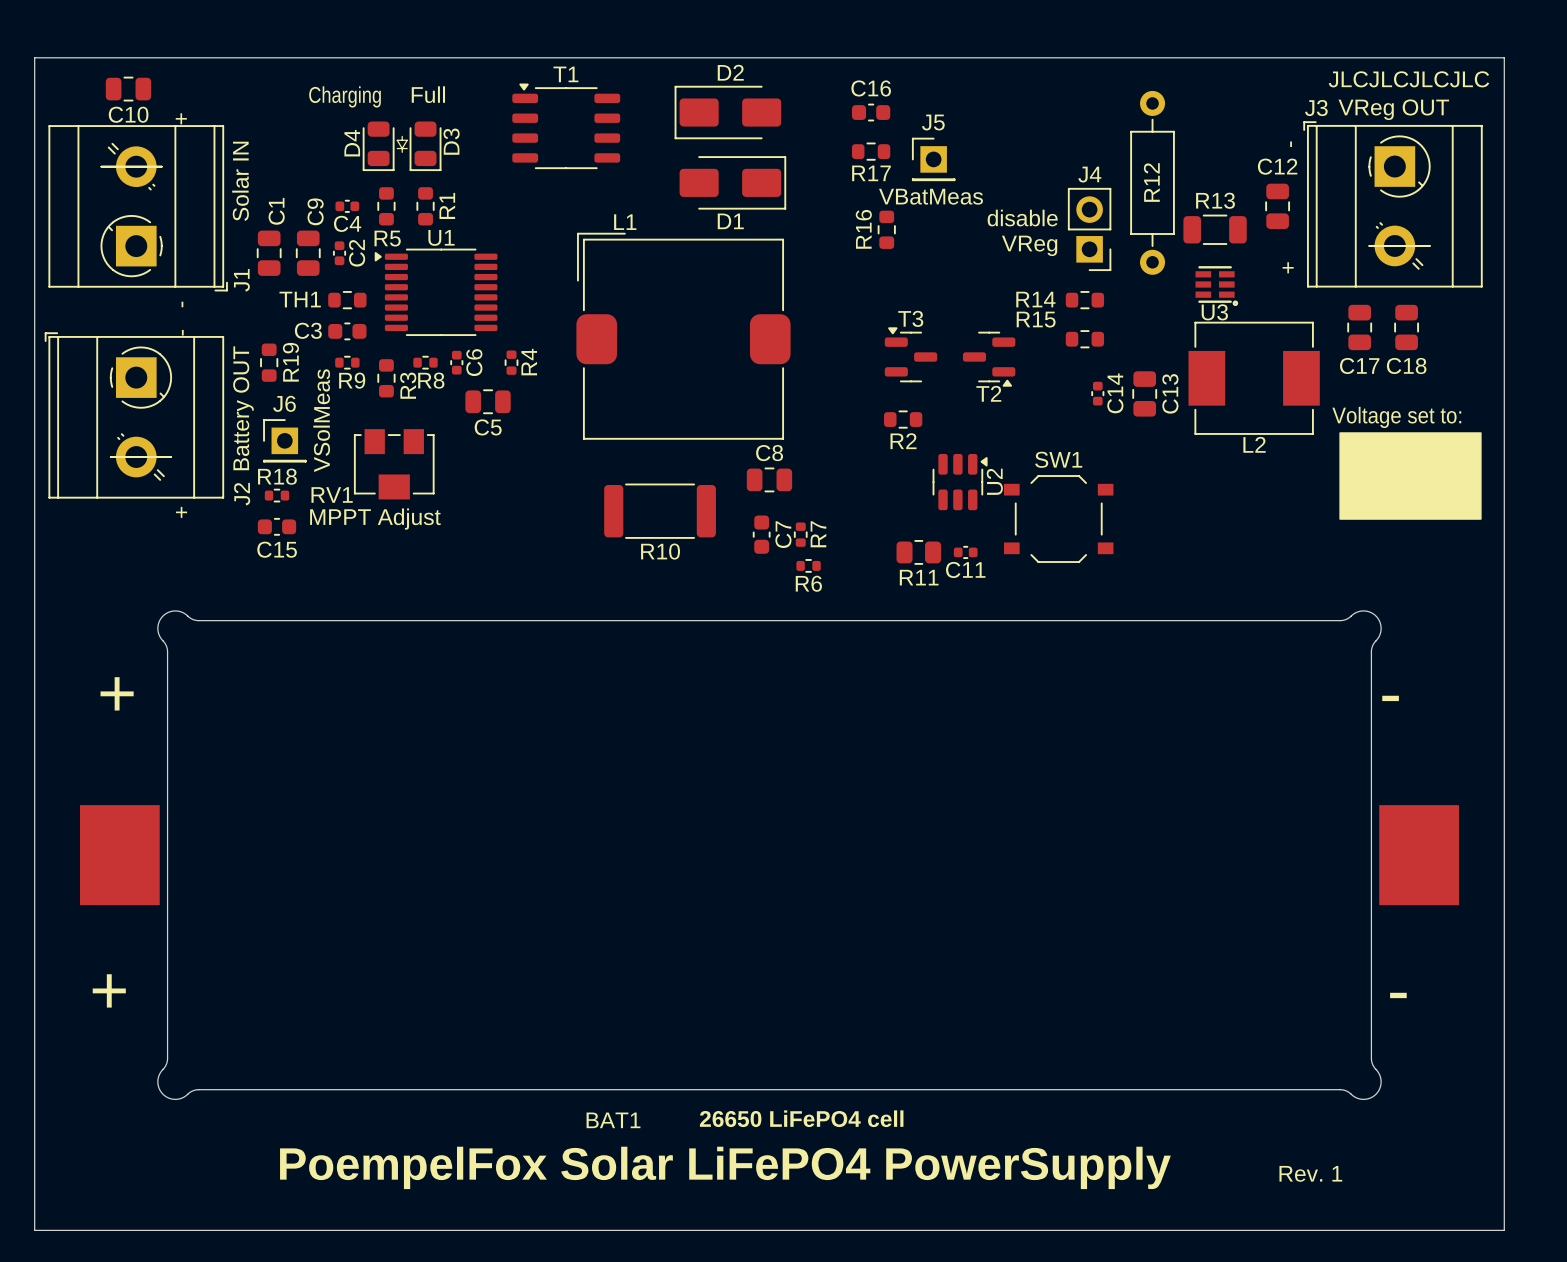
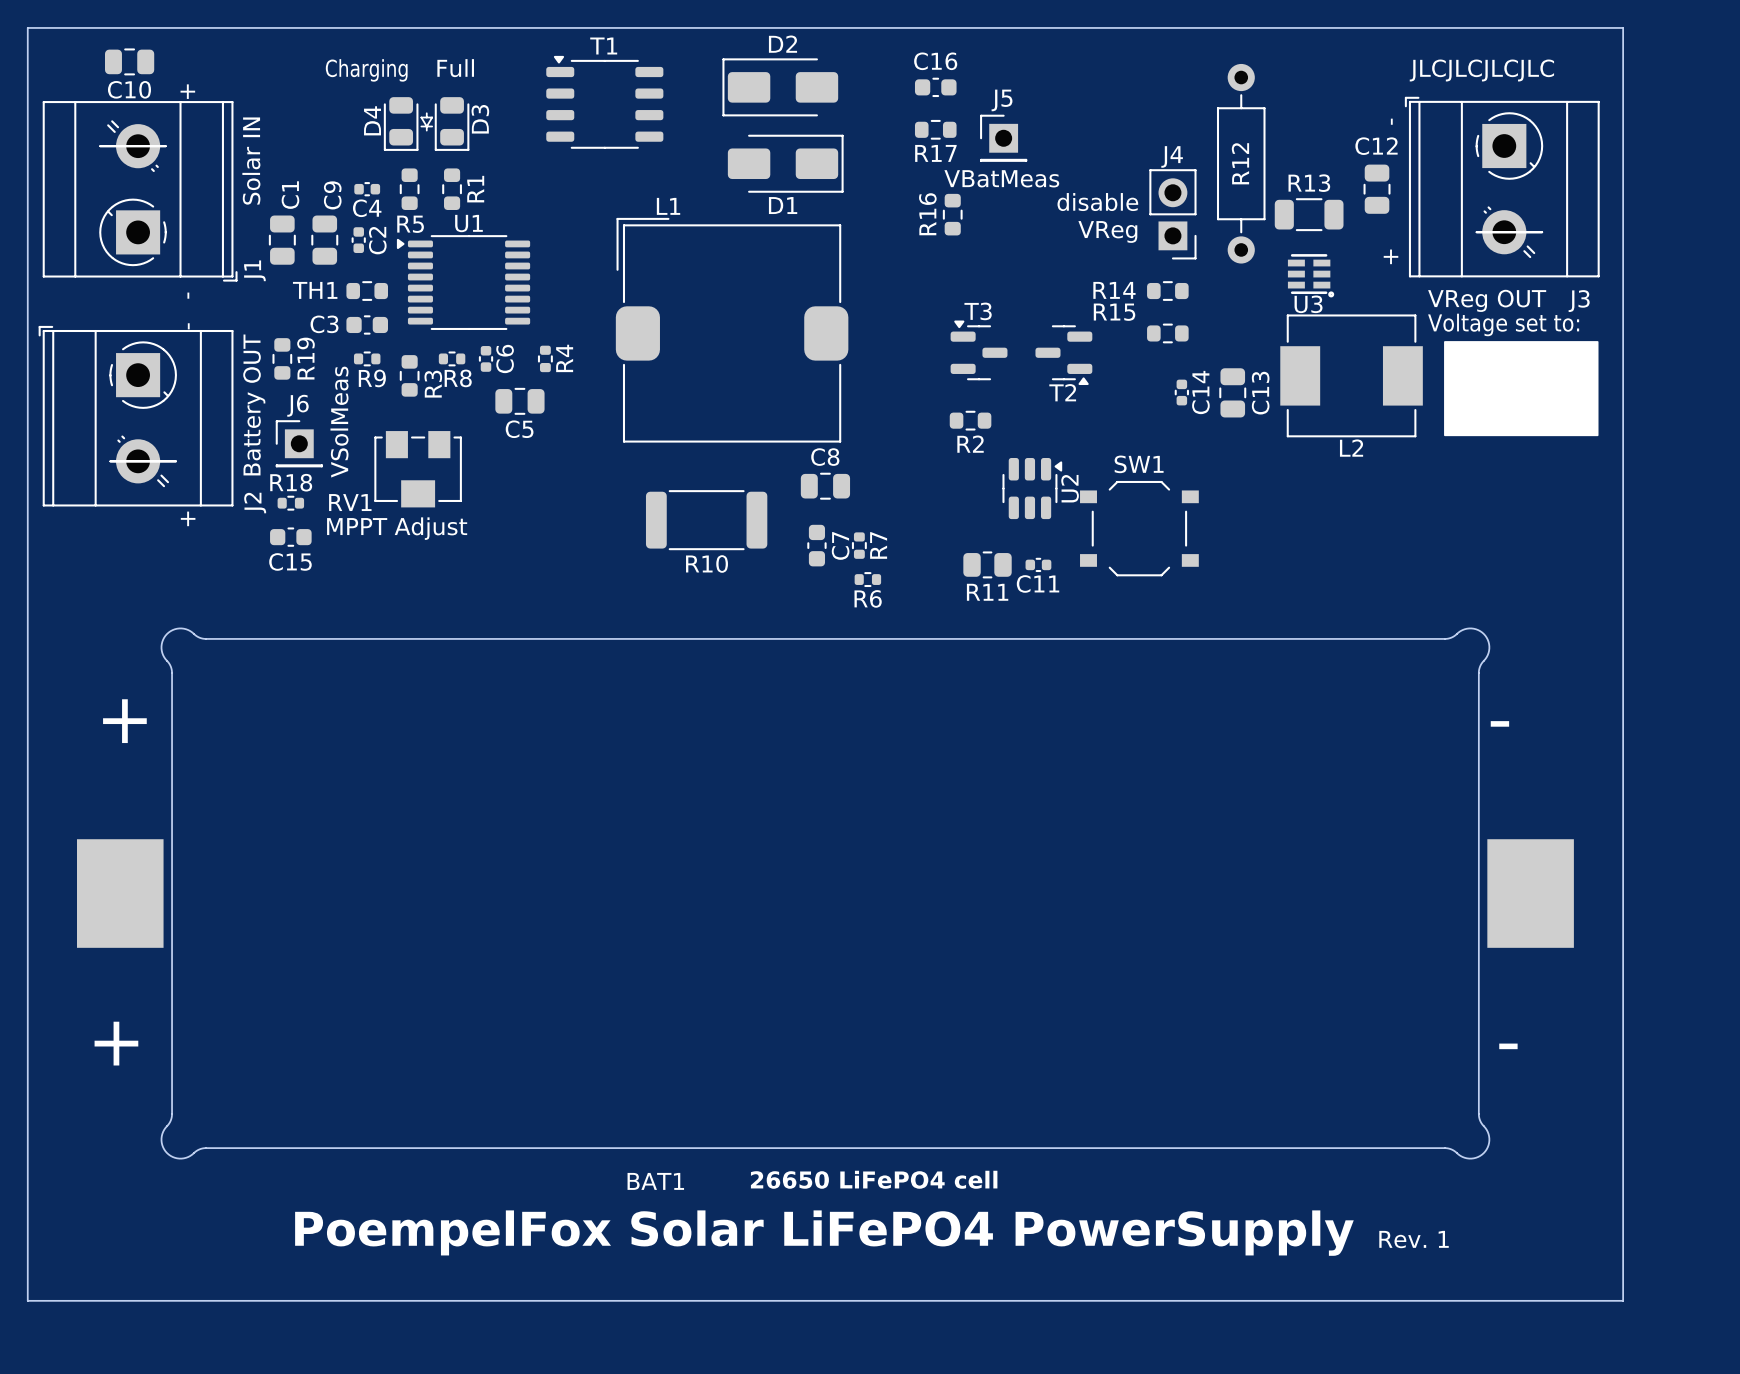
text position: JLCJLCJLCJLC (1408, 79) -> JLCJLCJLCJLC (1481, 70)
J3 name position: J3 (1316, 108) -> J3 (1579, 301)
text position: VReg OUT (1393, 109) -> VReg OUT (1487, 300)
C17: (1359, 327) -> none
C18: (1406, 327) -> none
text position: Voltage set to: (1396, 417) -> Voltage set to: (1503, 324)
drawing position: (1410, 476) -> (1521, 388)

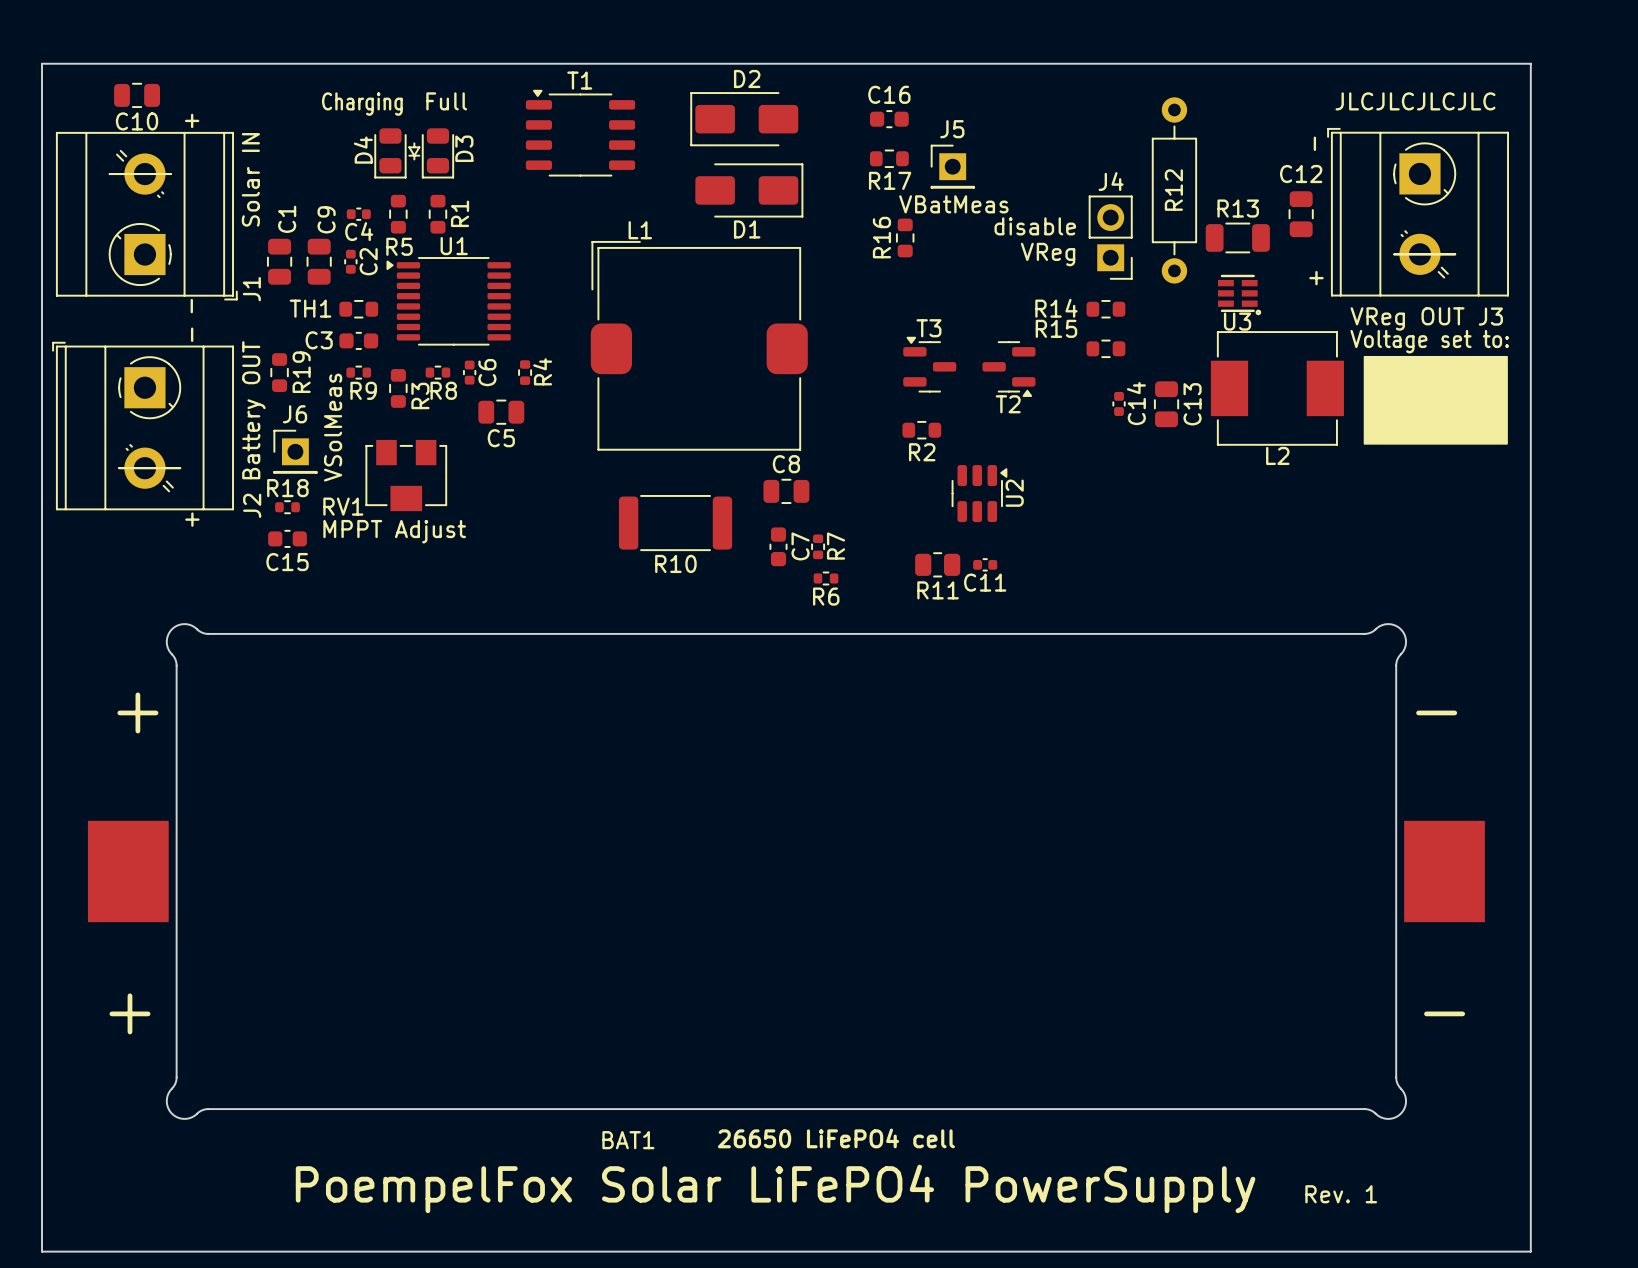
SW1: (1139, 528) -> none

